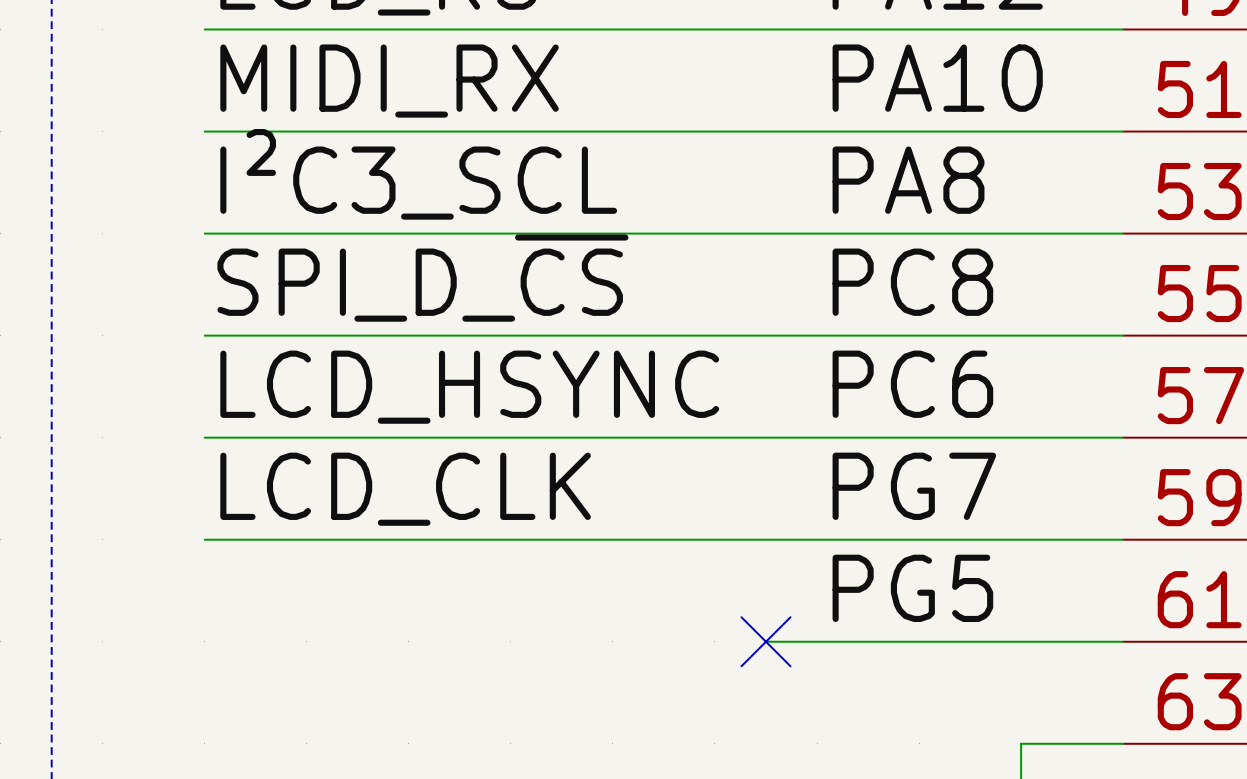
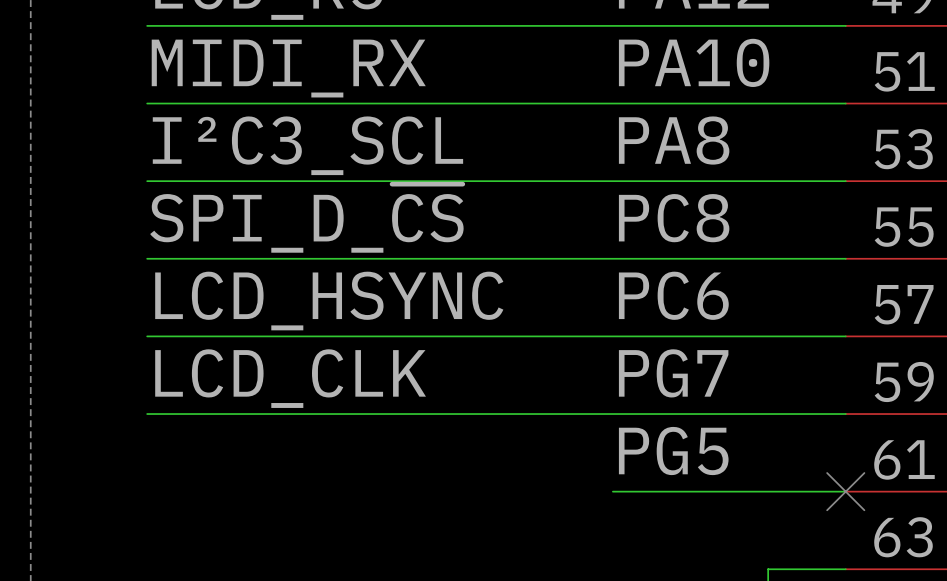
wire: (765, 641) (817, 641) -> none
no-connect mark: (765, 641) -> none
no-connect mark: none -> (845, 491)

